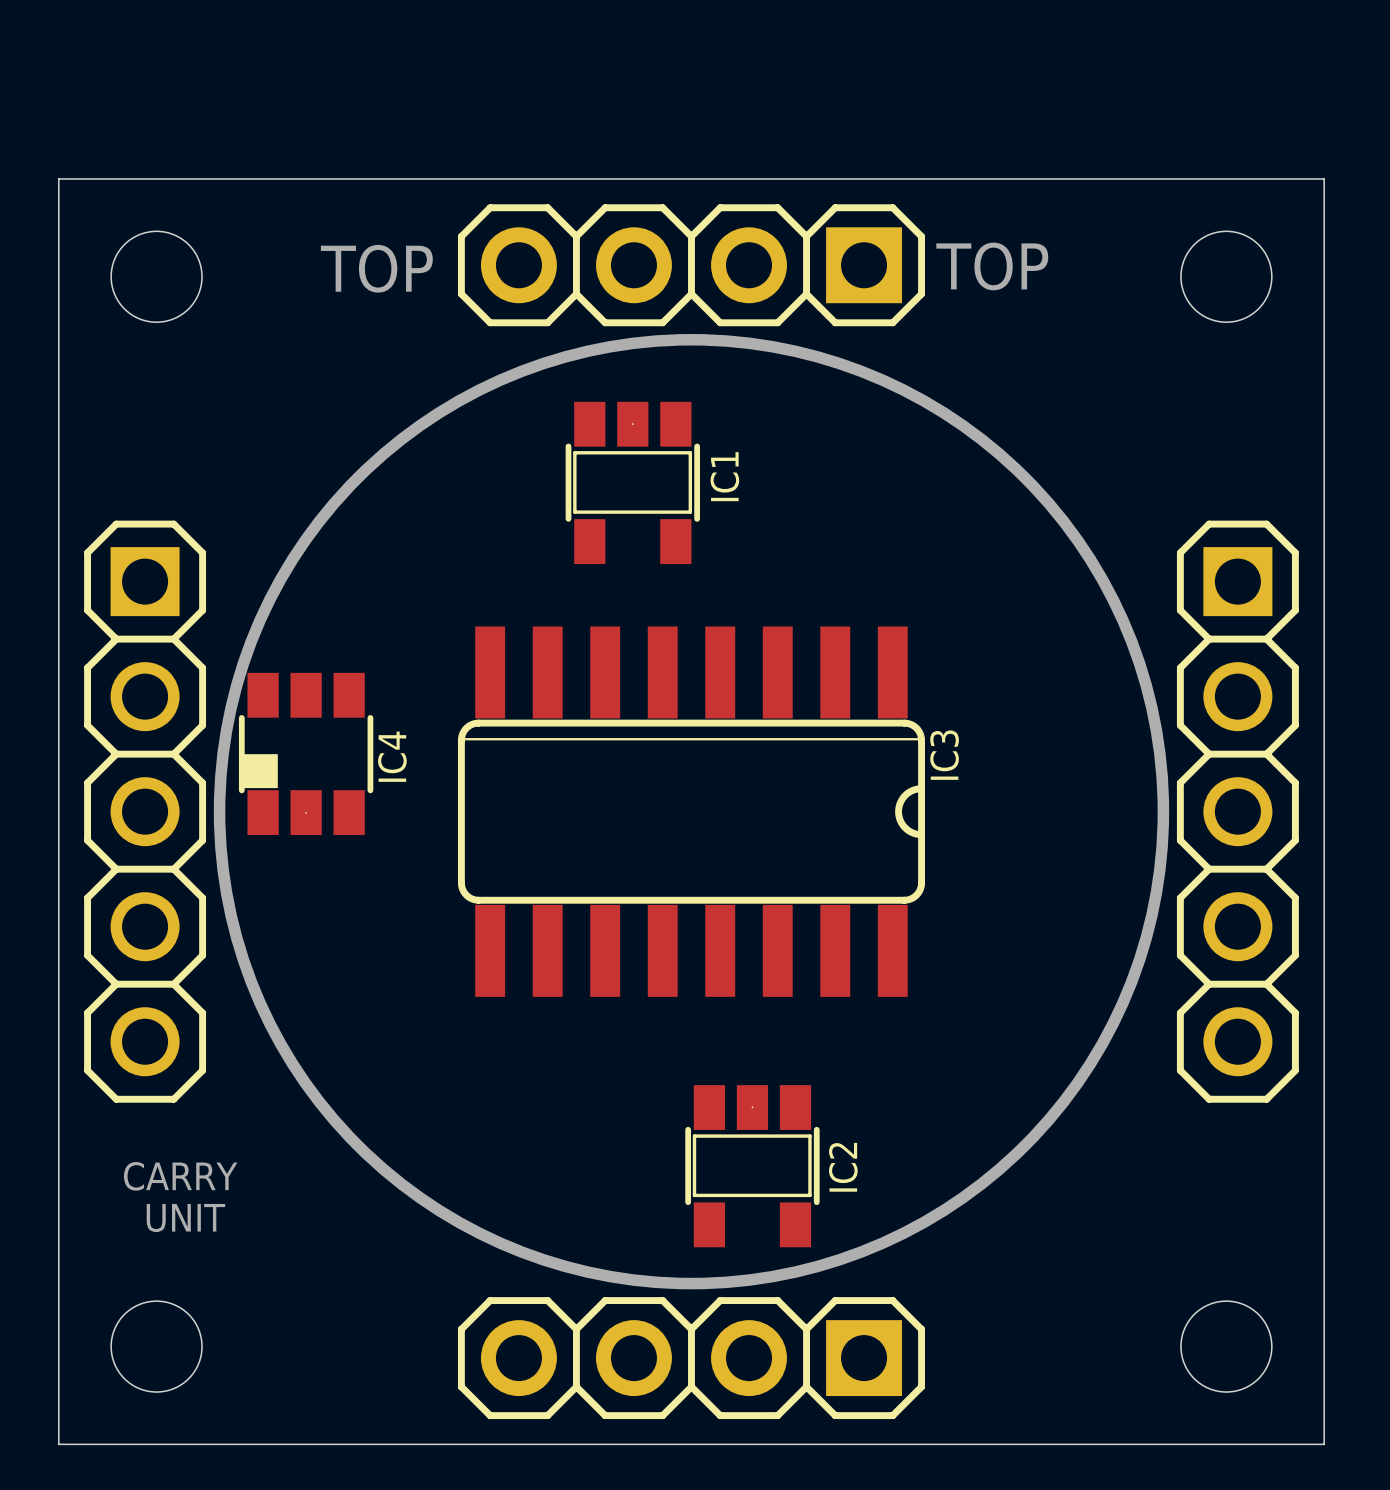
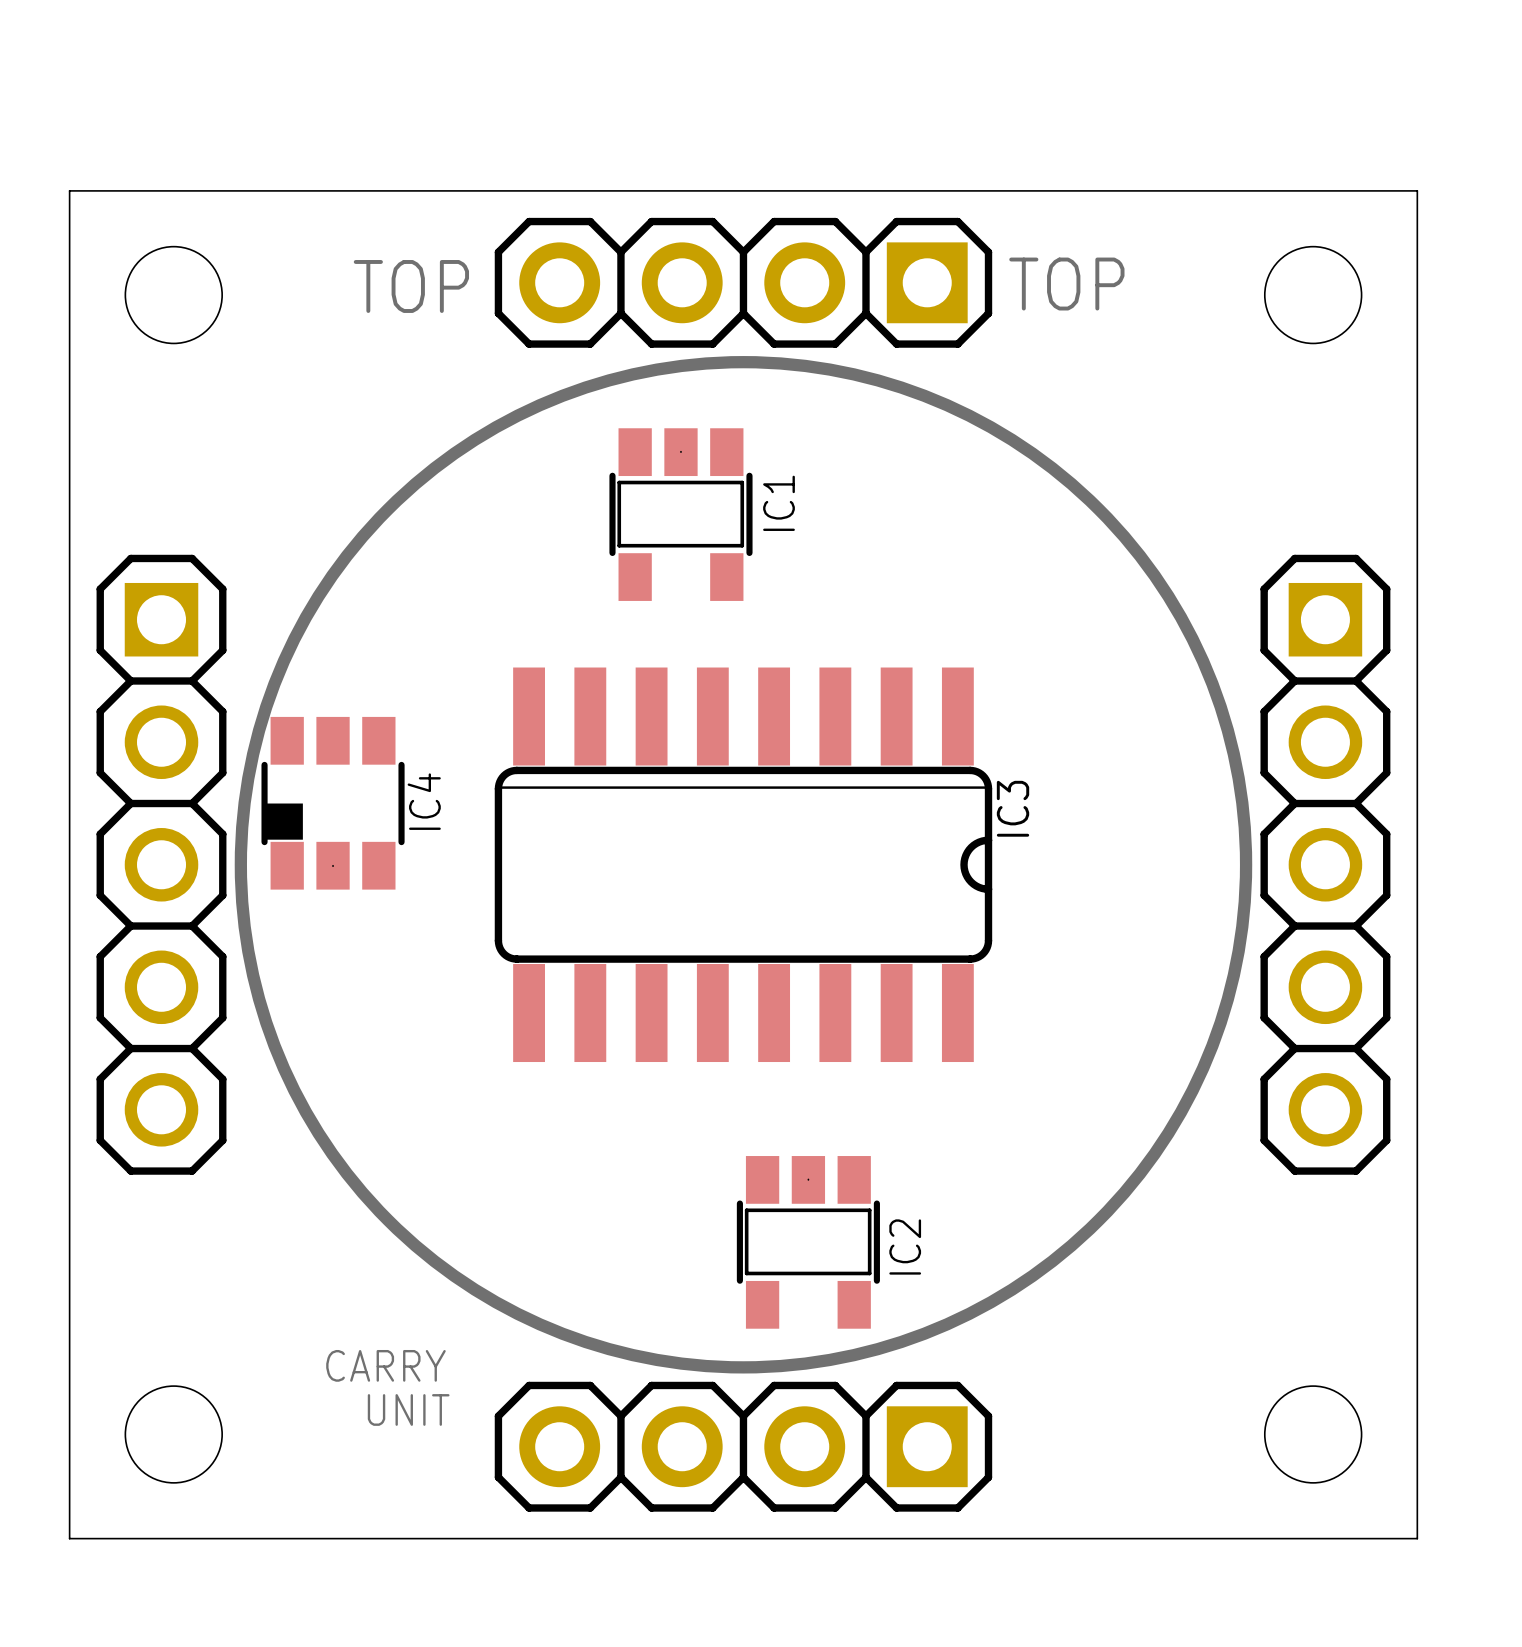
text position: CARRY (180, 1176) -> CARRY (385, 1365)
text position: UNIT (185, 1218) -> UNIT (408, 1409)

